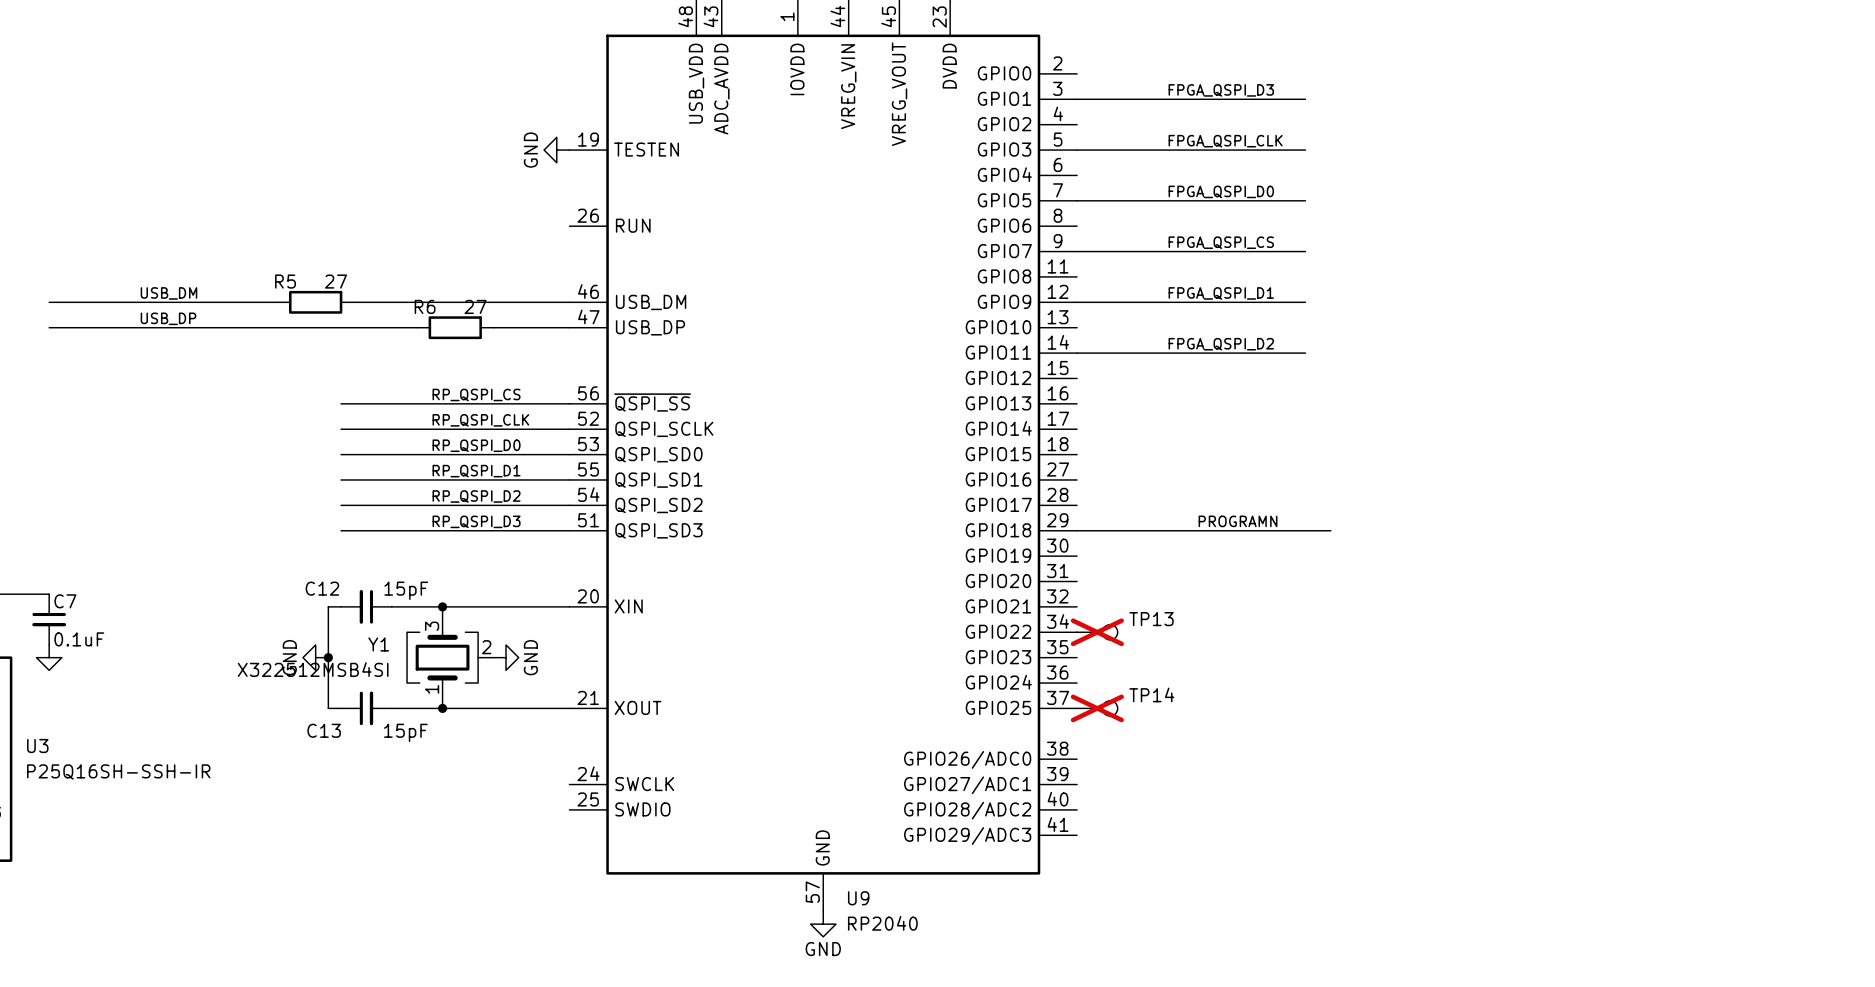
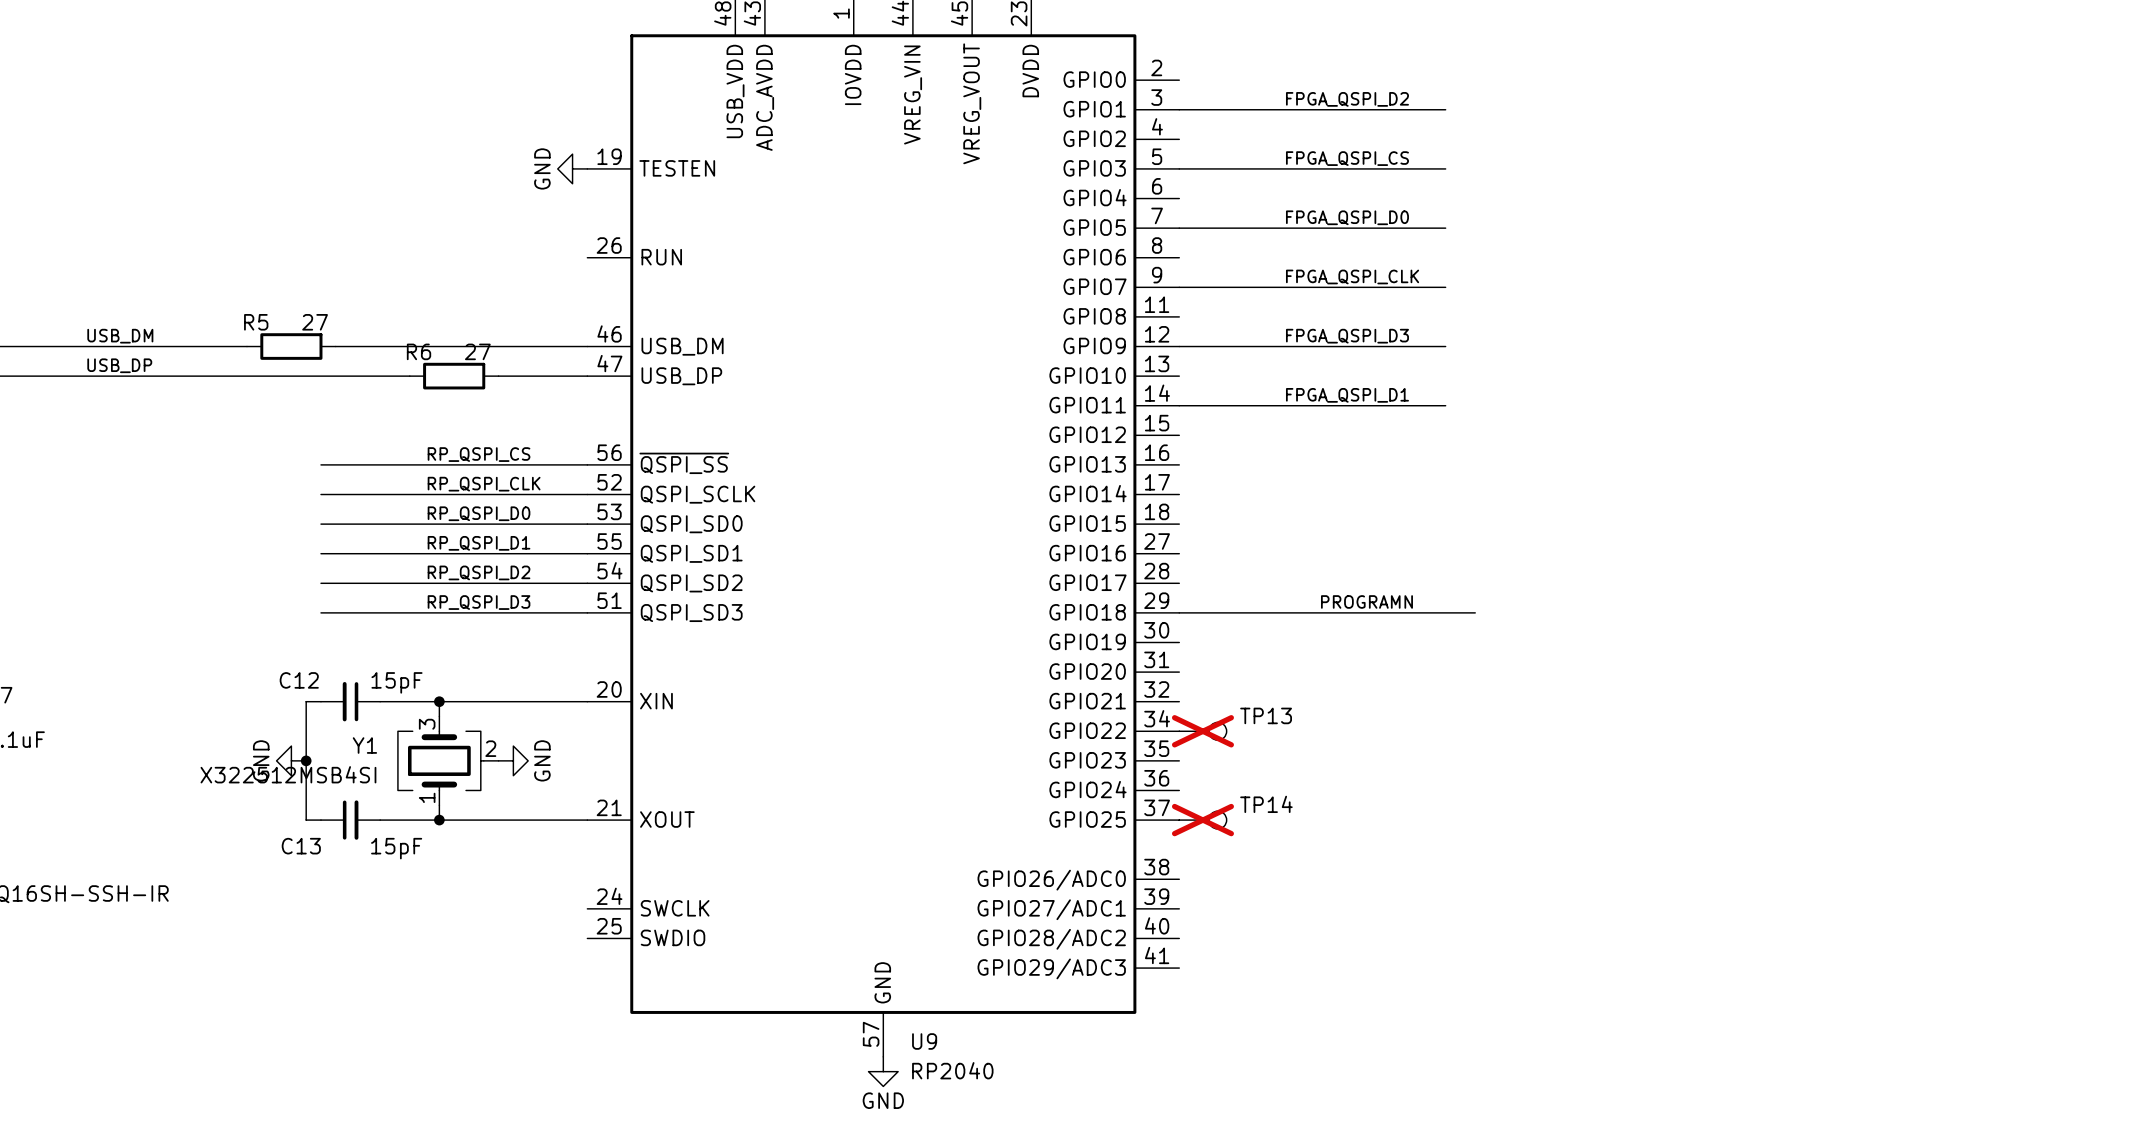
label: FPGA_QSPI_D3 (1221, 90) -> FPGA_QSPI_D2 (1347, 99)
label: FPGA_QSPI_CLK (1225, 141) -> FPGA_QSPI_CS (1347, 158)
label: FPGA_QSPI_CS (1221, 242) -> FPGA_QSPI_CLK (1352, 276)
label: FPGA_QSPI_D1 (1221, 293) -> FPGA_QSPI_D3 (1347, 336)
label: FPGA_QSPI_D2 (1221, 344) -> FPGA_QSPI_D1 (1347, 395)

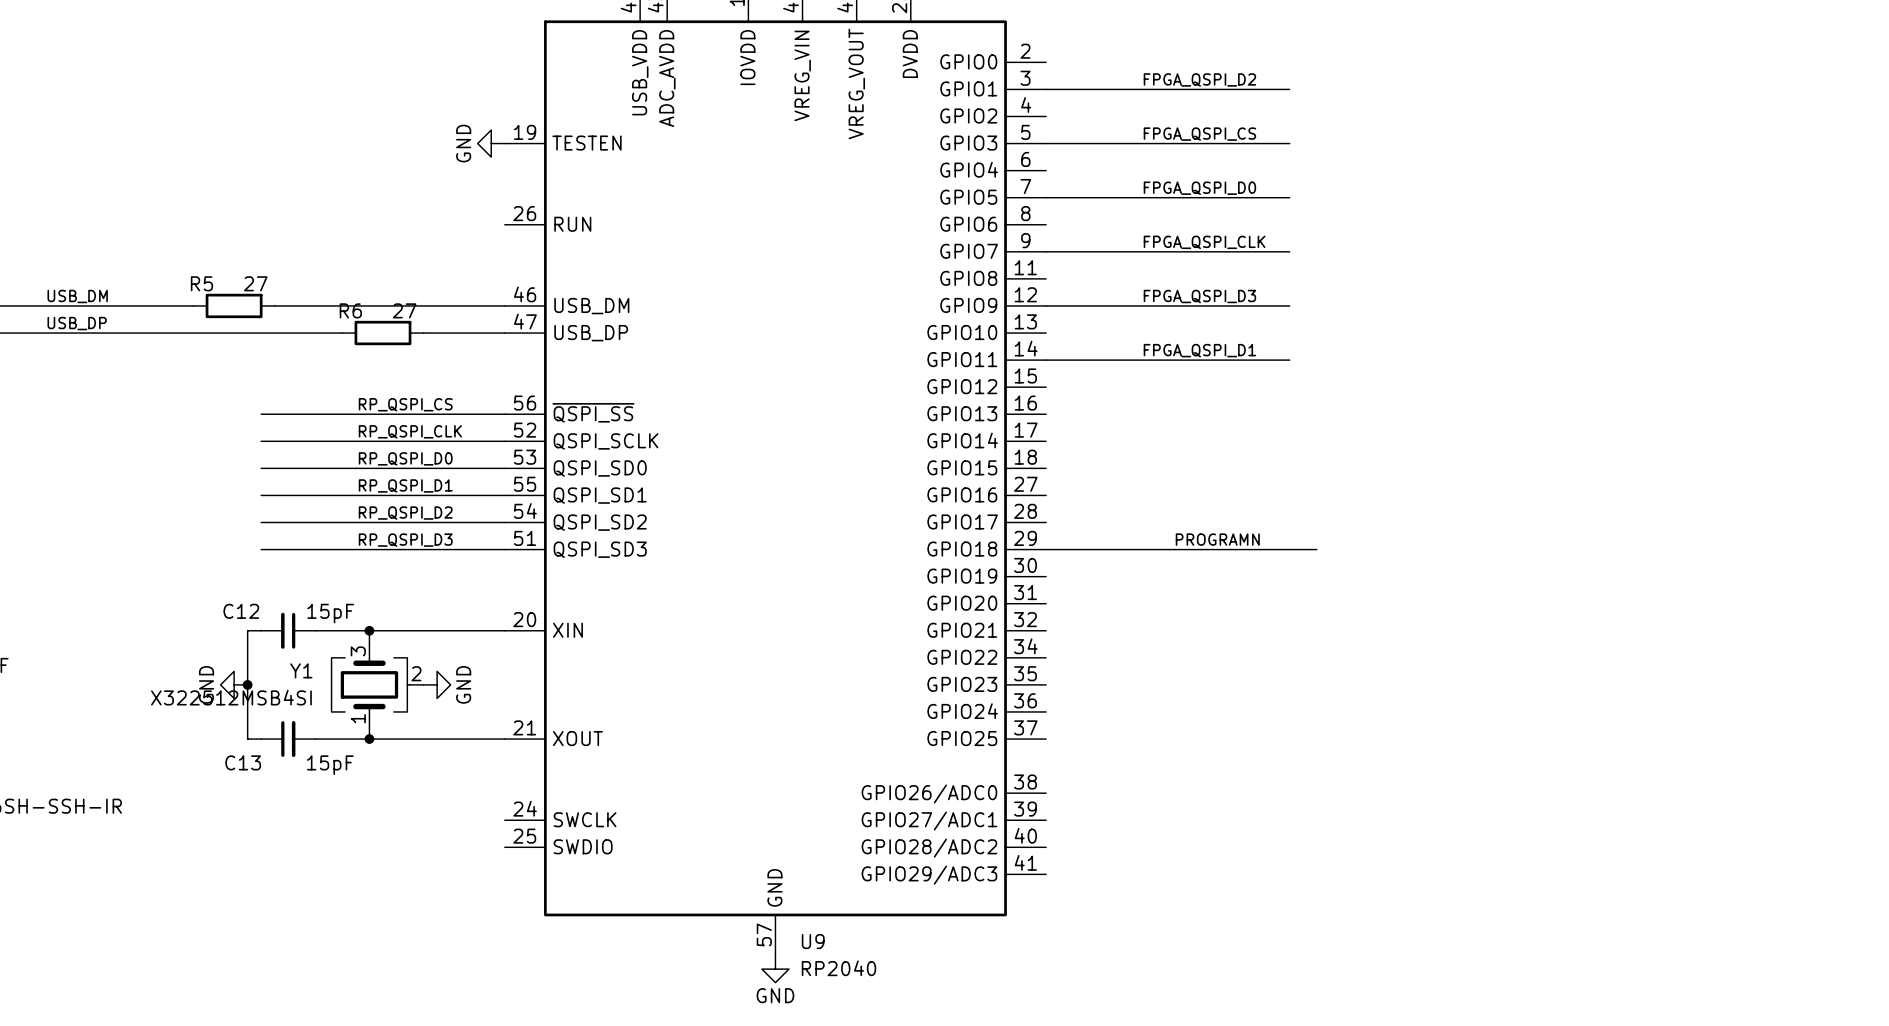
TP13: (1202, 731) -> none
TP14: (1202, 820) -> none

